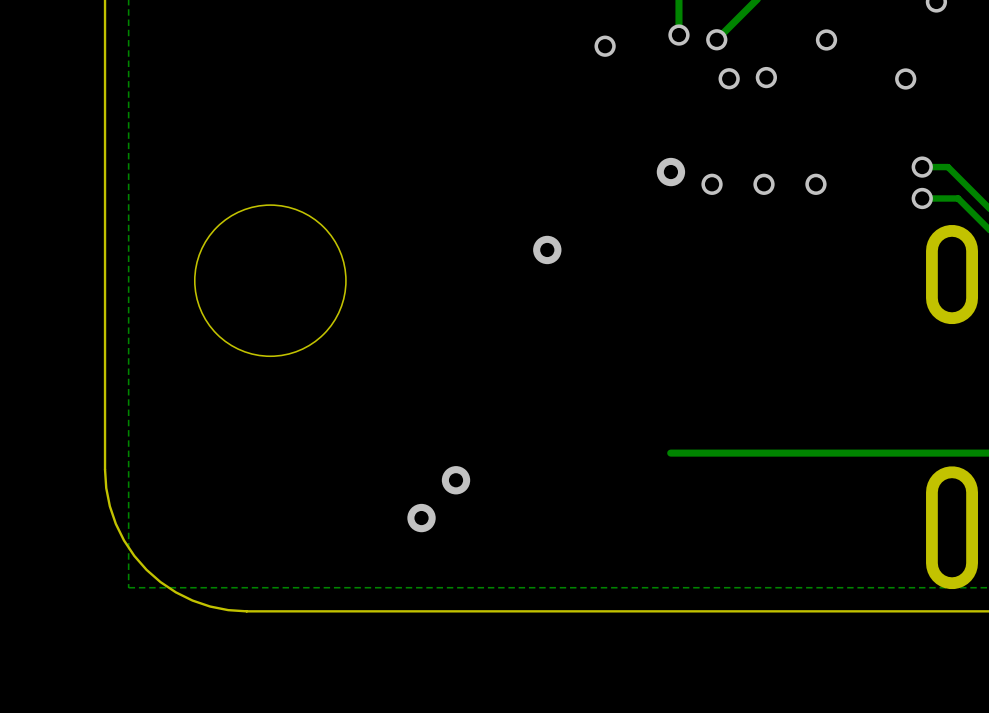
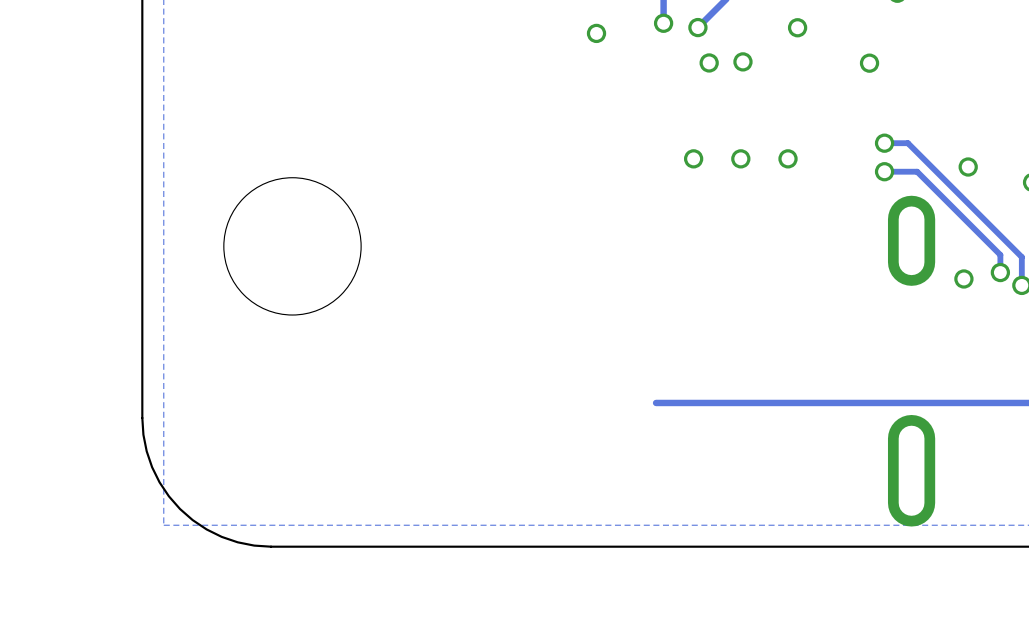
via: (670, 172) -> none
via: (547, 249) -> none
via: (456, 480) -> none
via: (421, 518) -> none

